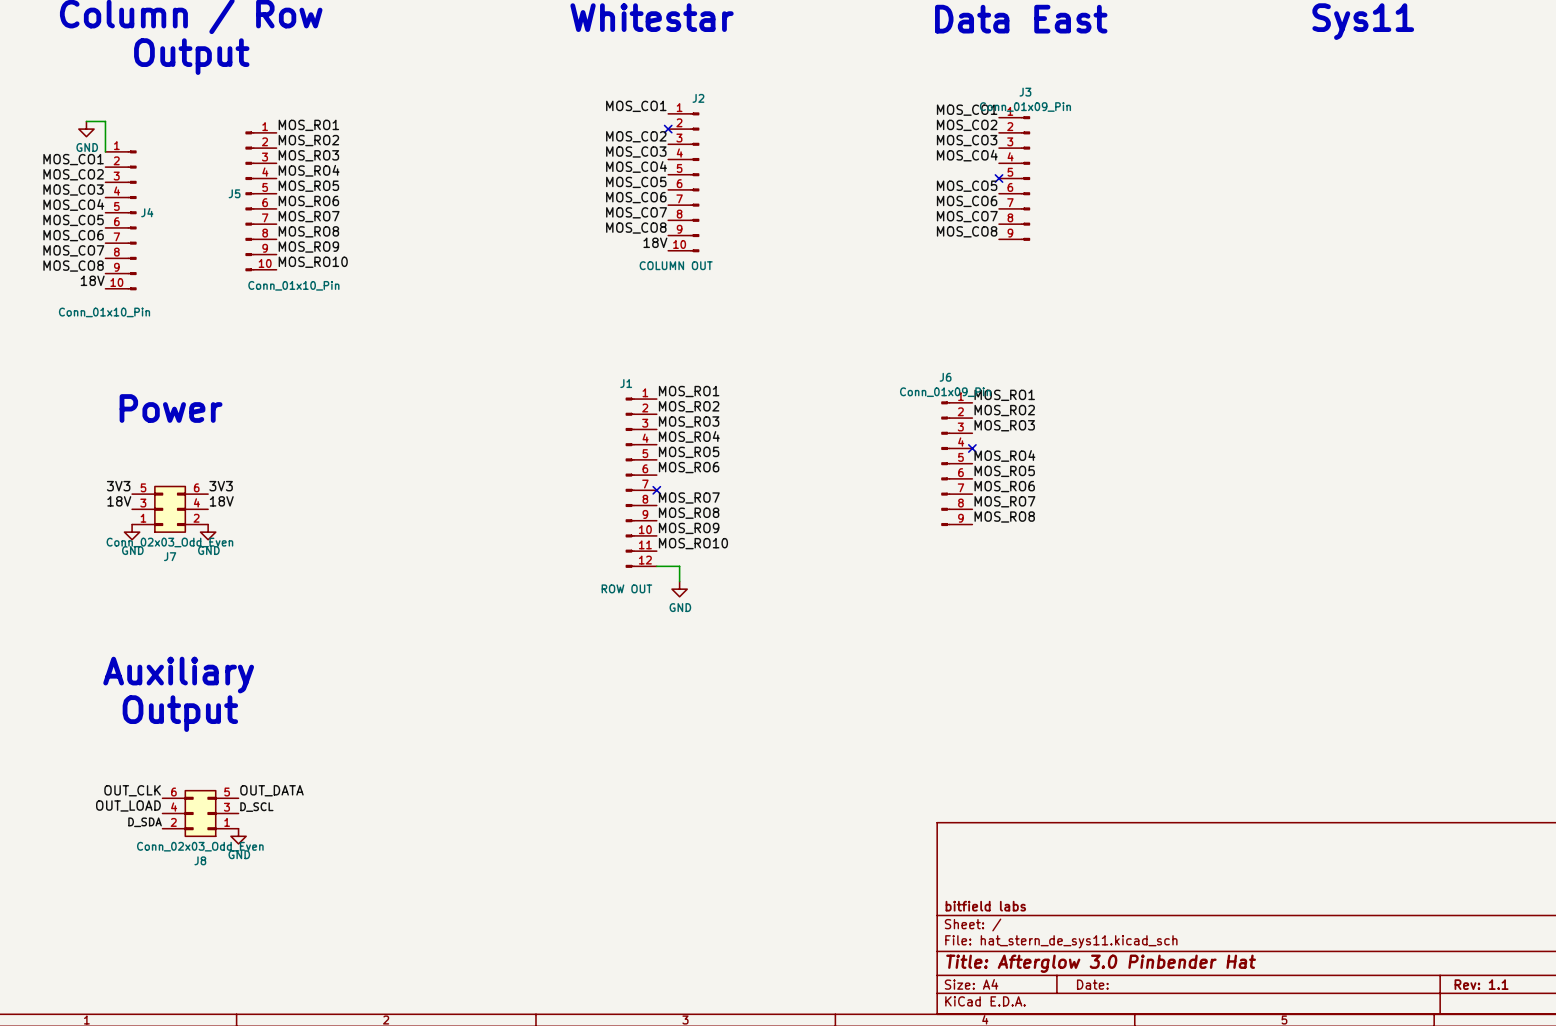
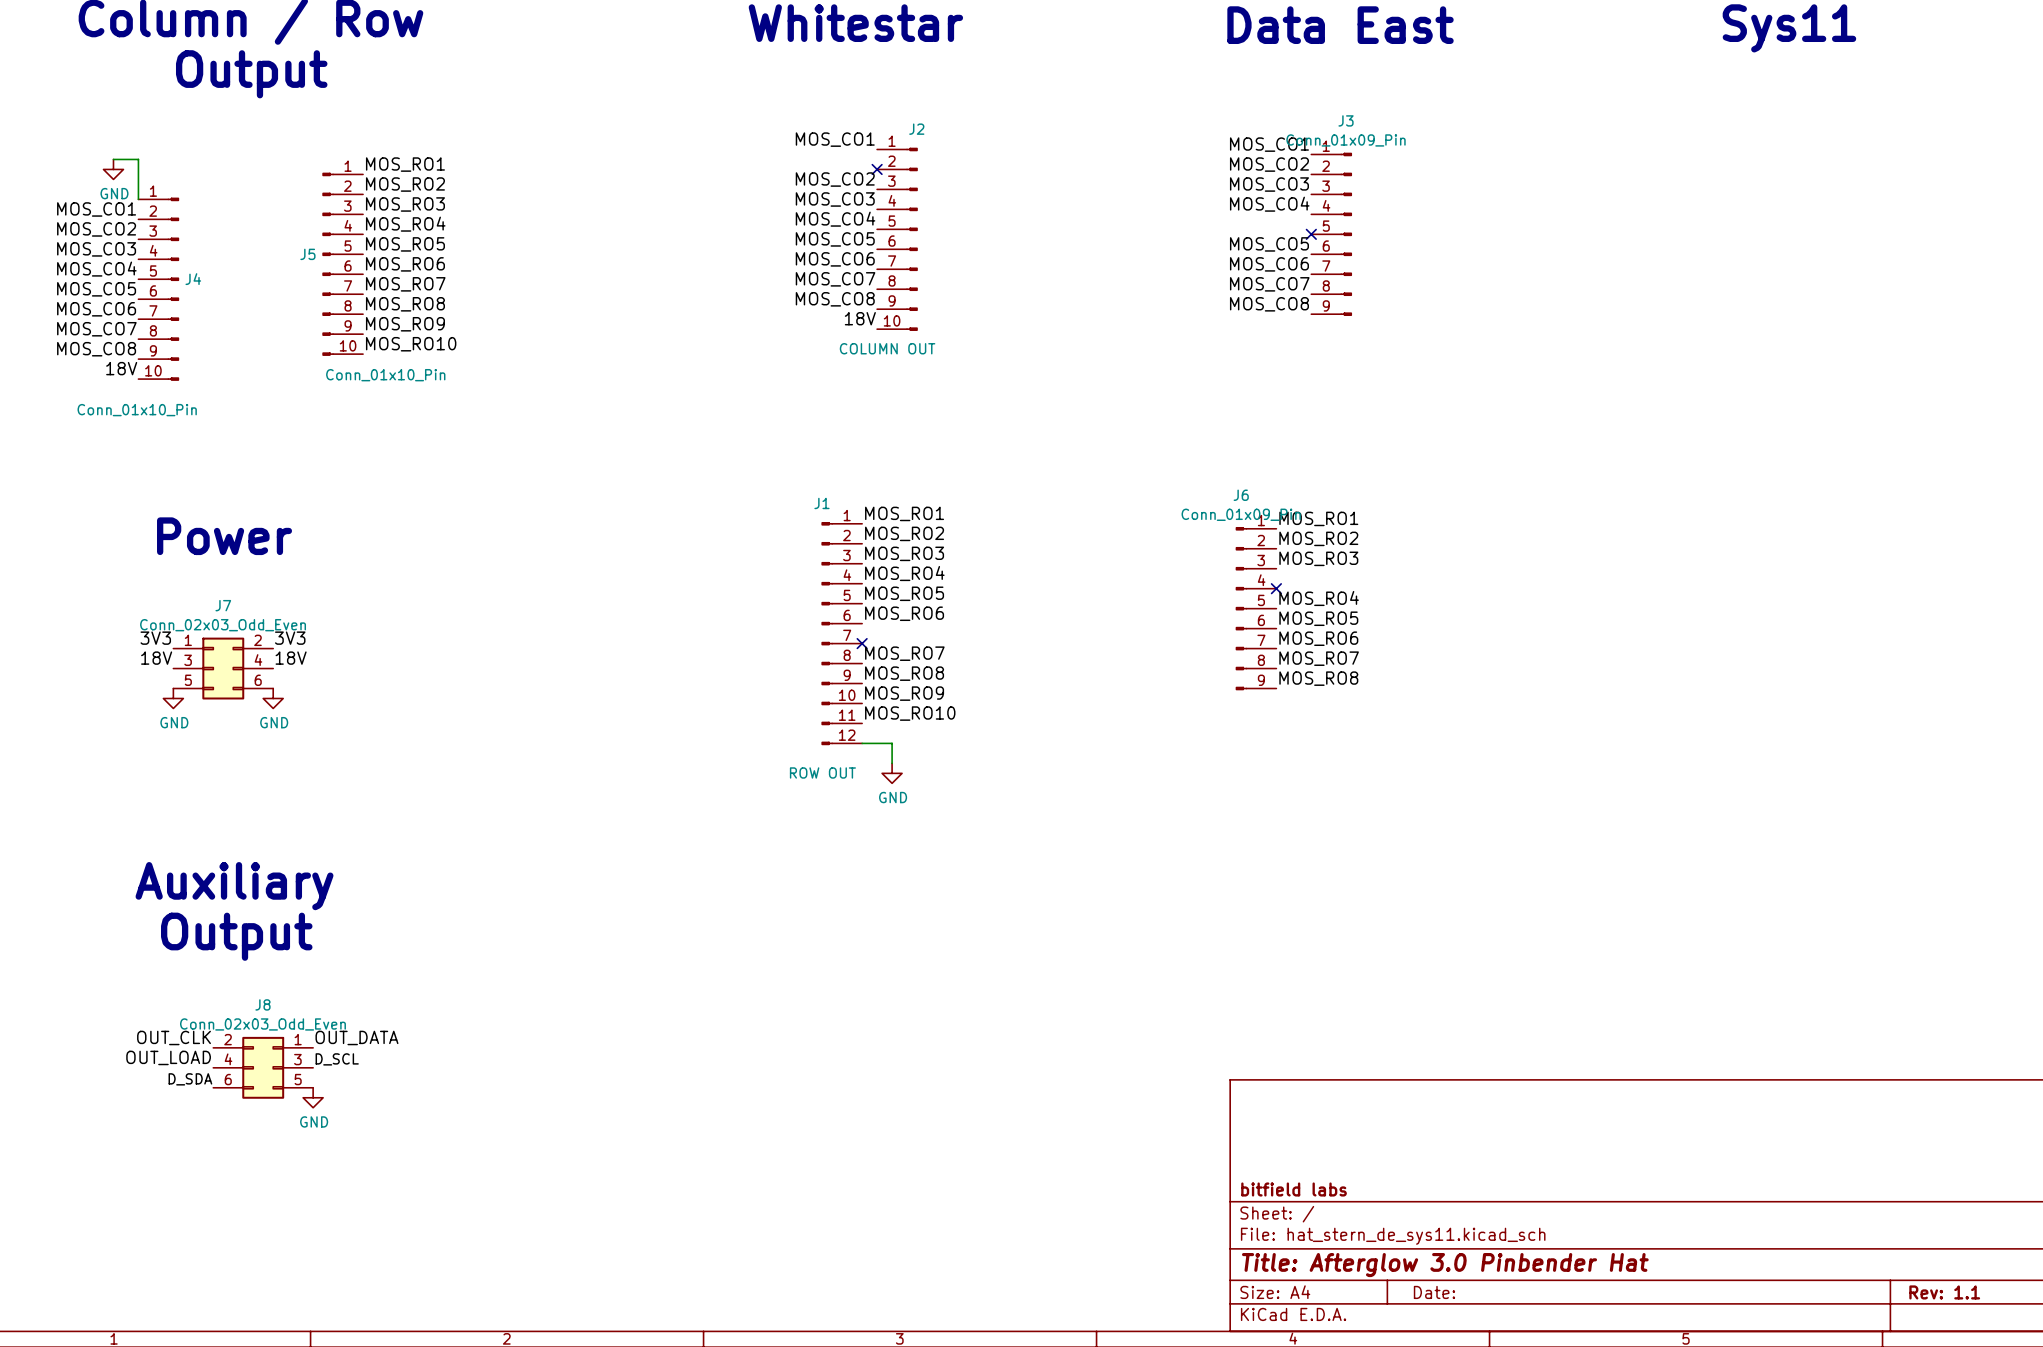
J7 flip: as is (170, 509) -> up-down (223, 668)
J8 flip: as is (200, 813) -> up-down (263, 1067)

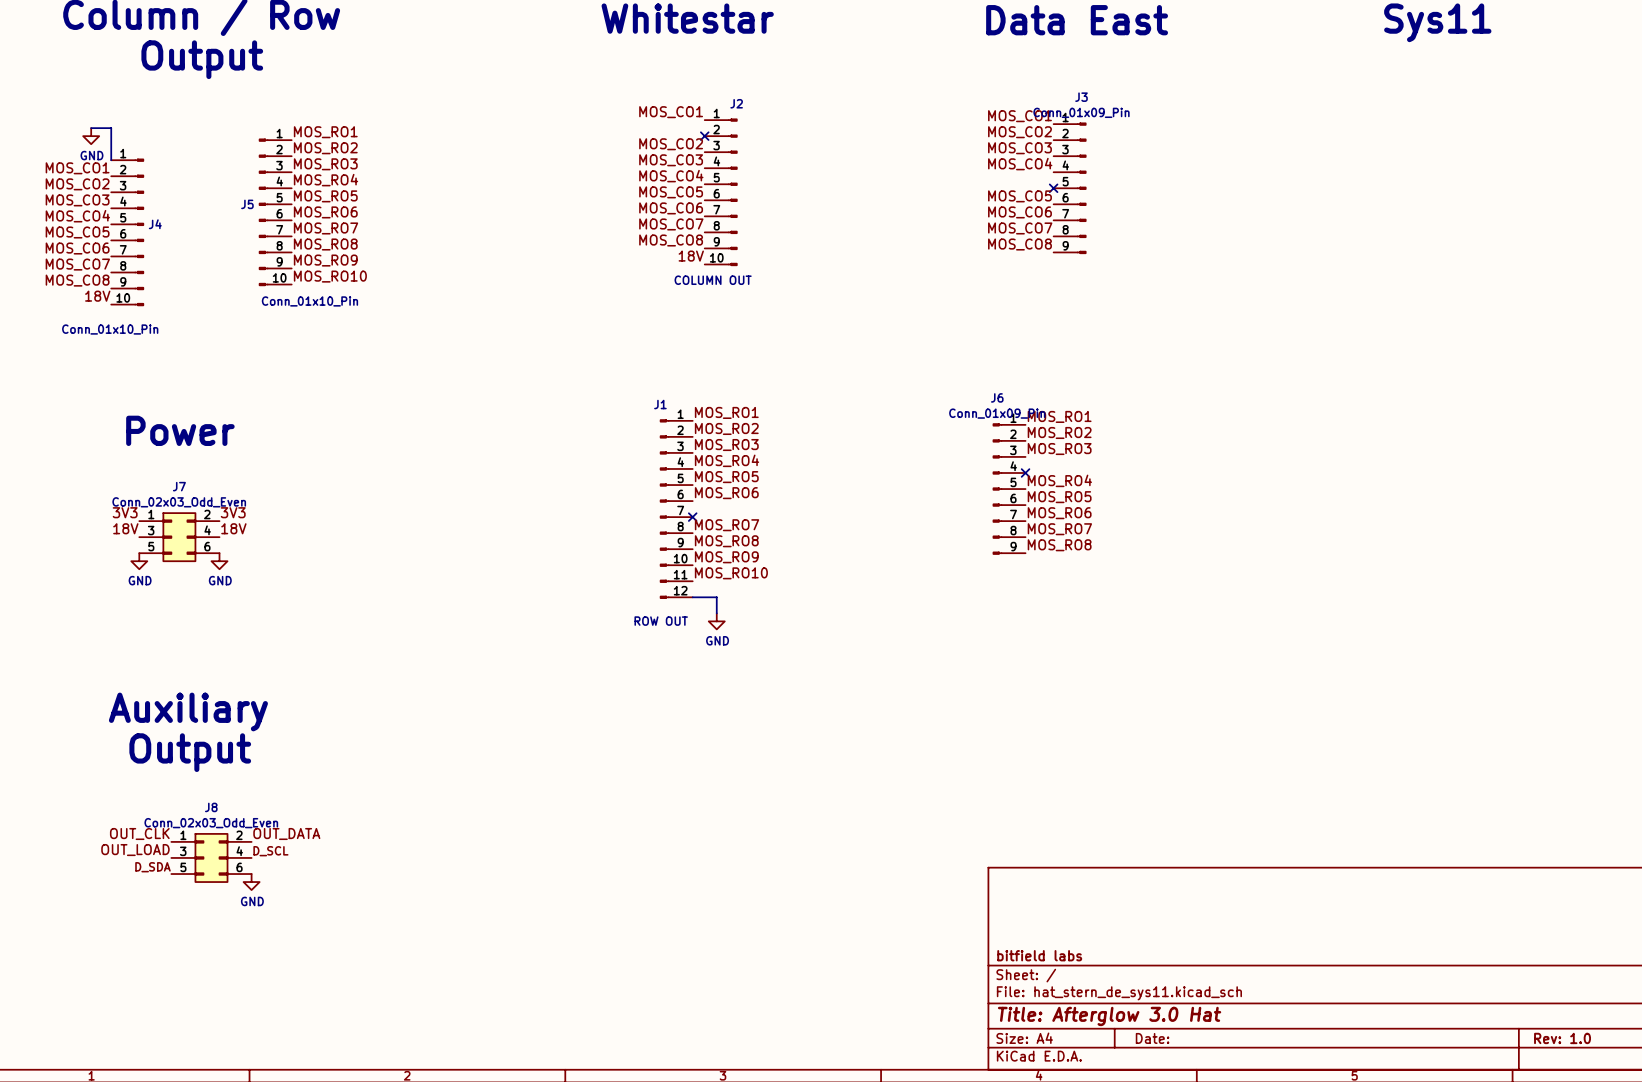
J8 flip: as is (263, 1067) -> left-right (211, 857)
title block: Title: Afterglow 3.0 Pinbender Hat (1445, 1265) -> Title: Afterglow 3.0 Hat (1109, 1016)
title block: Rev: 1.1 (1944, 1292) -> Rev: 1.0 (1562, 1038)

